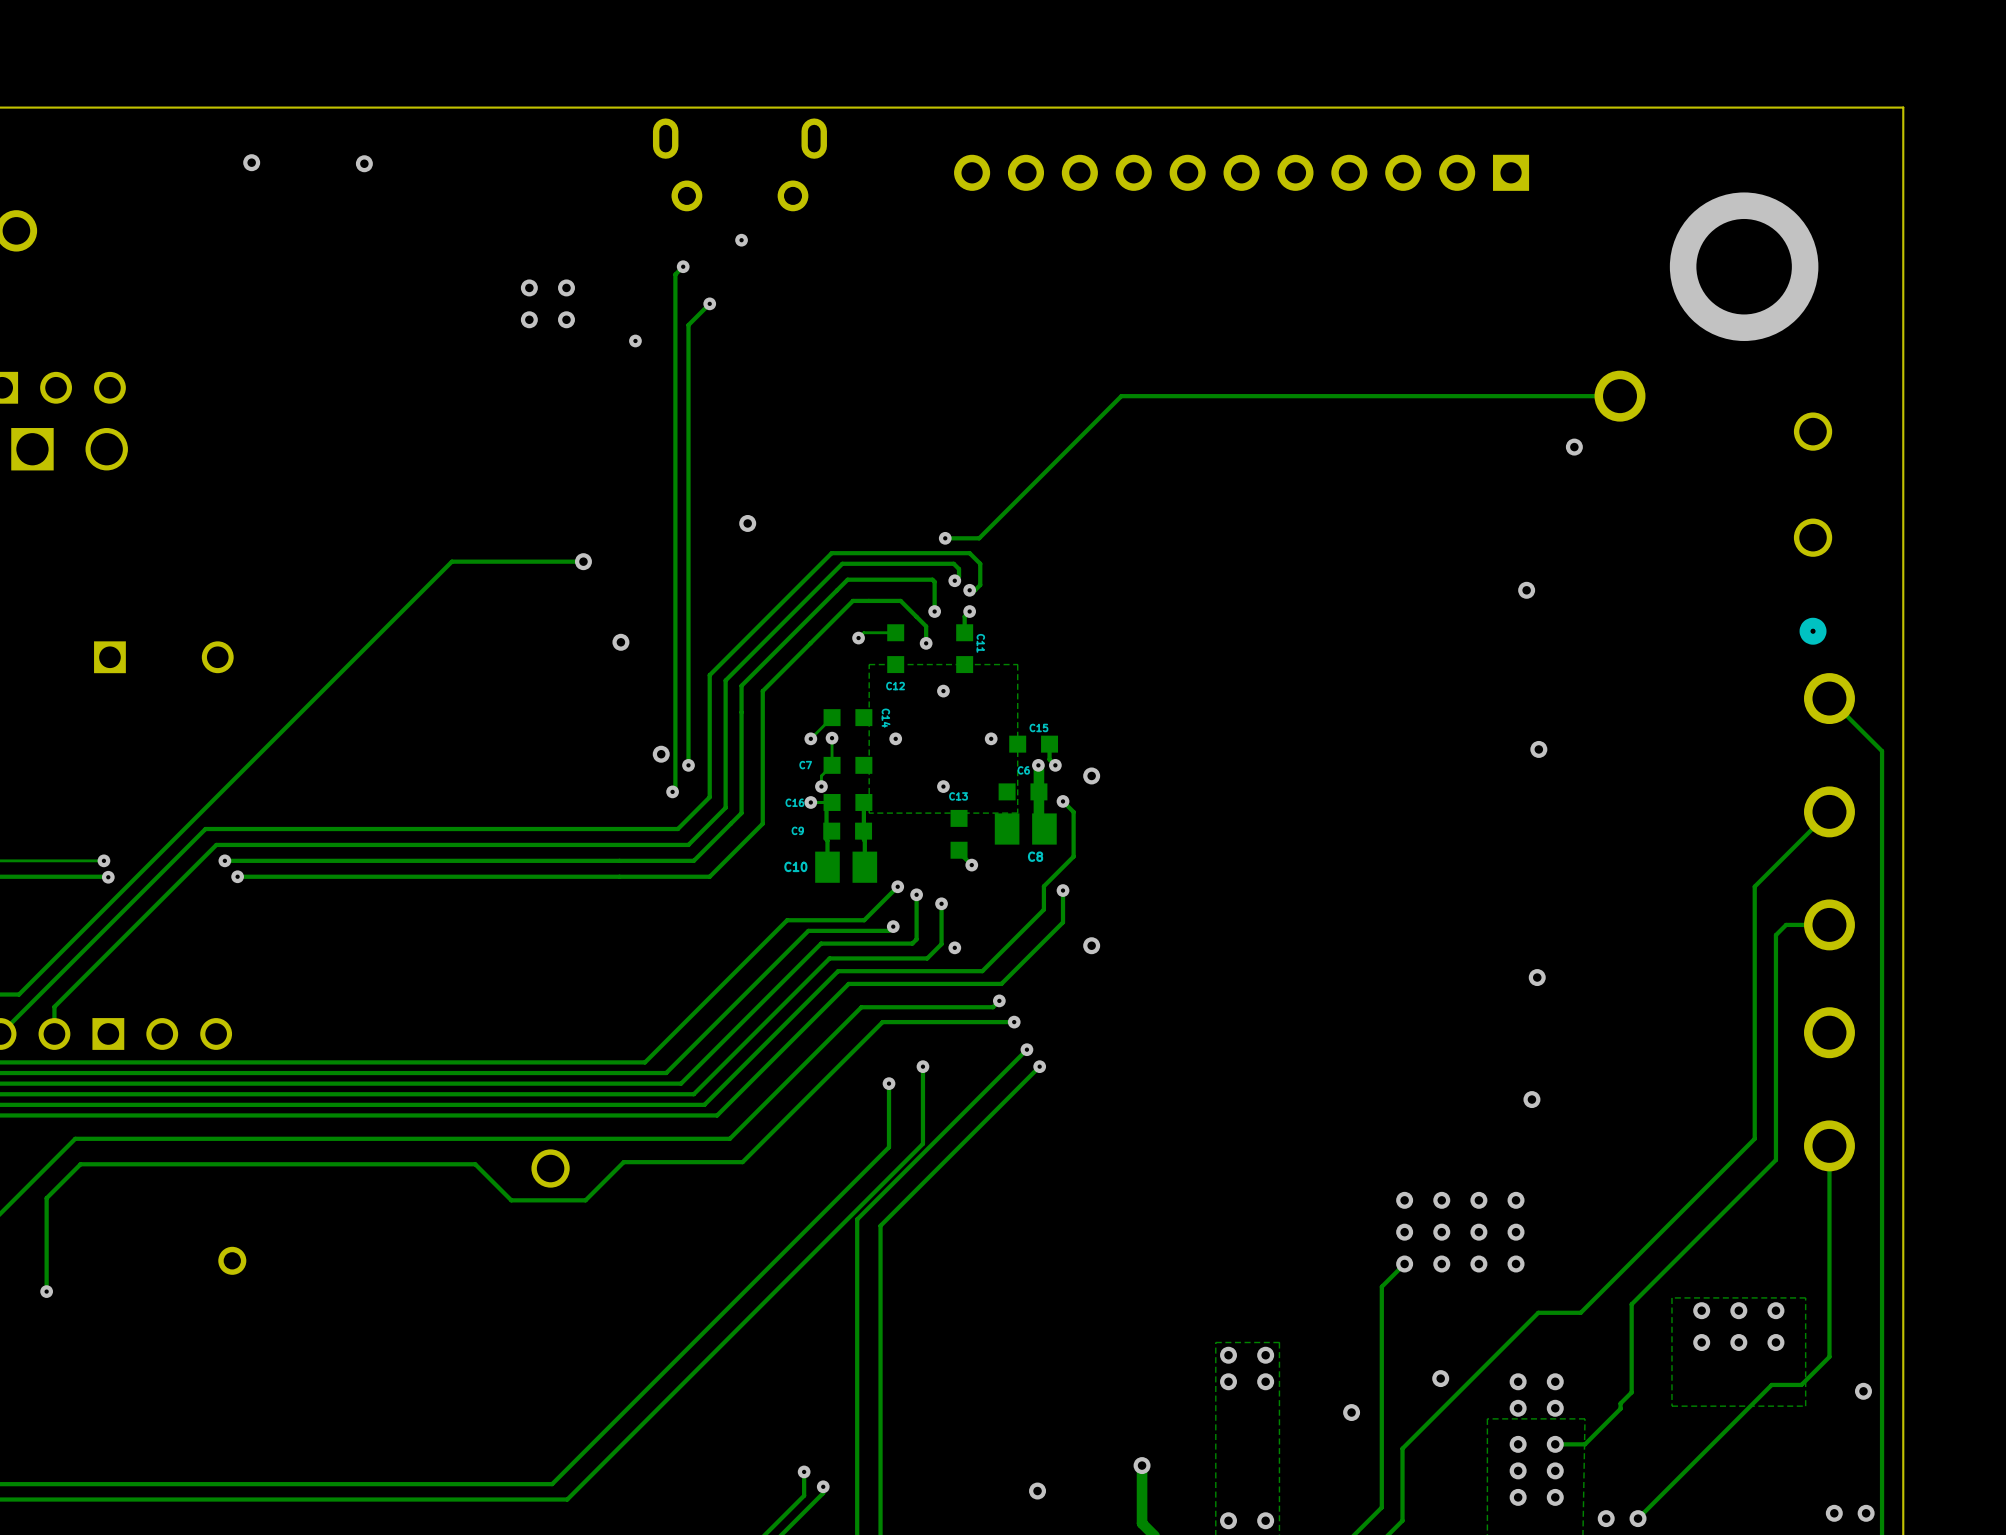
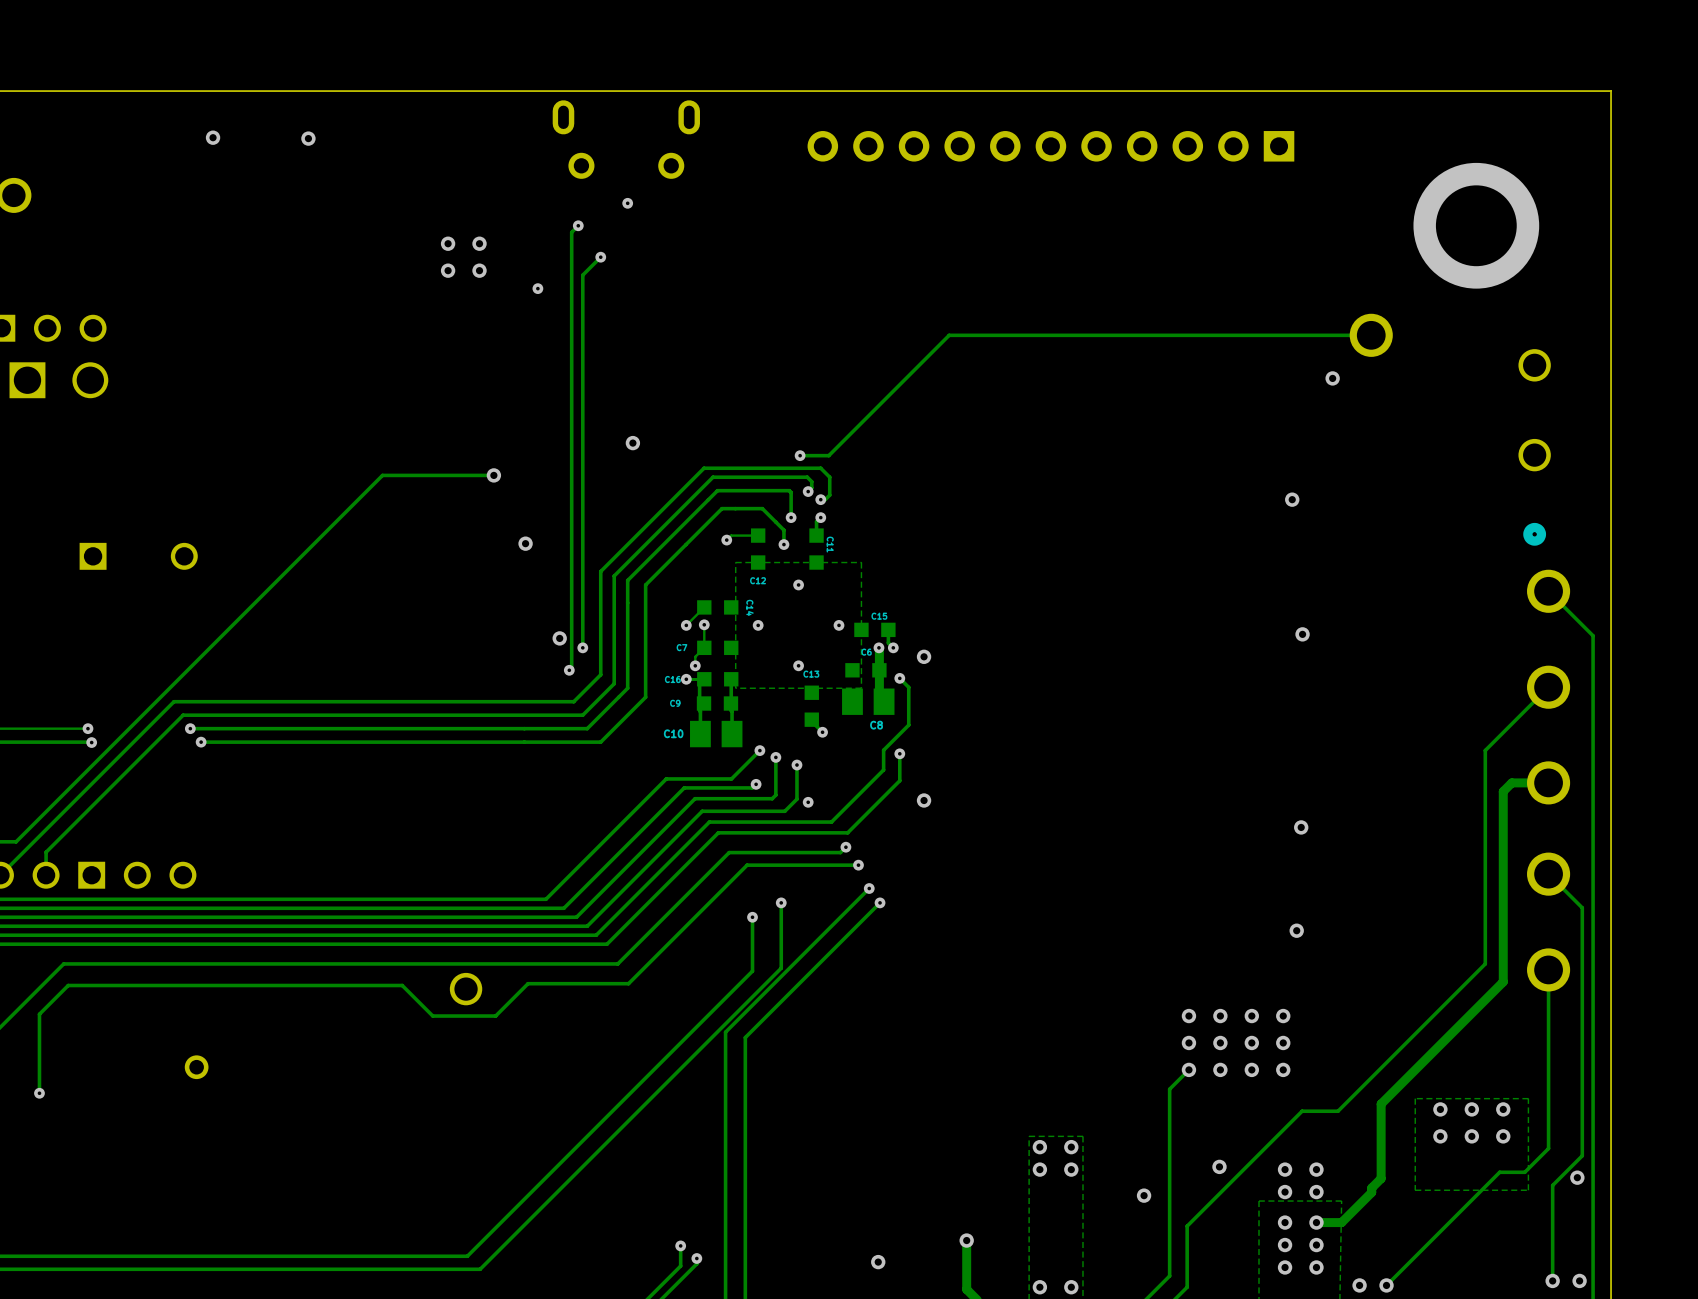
track width: thin (1829, 924) (1786, 924) (1775, 935) (1775, 1160) (1631, 1304) (1631, 1392) (1620, 1403) (1620, 1408) (1584, 1444) (1555, 1444) -> thick (1548, 782) (1511, 782) (1503, 791) (1503, 981) (1381, 1104) (1381, 1178) (1371, 1188) (1371, 1192) (1341, 1222) (1316, 1222)
track: none -> (1548, 874) (1582, 907) (1582, 1155) (1552, 1185) (1552, 1280)

